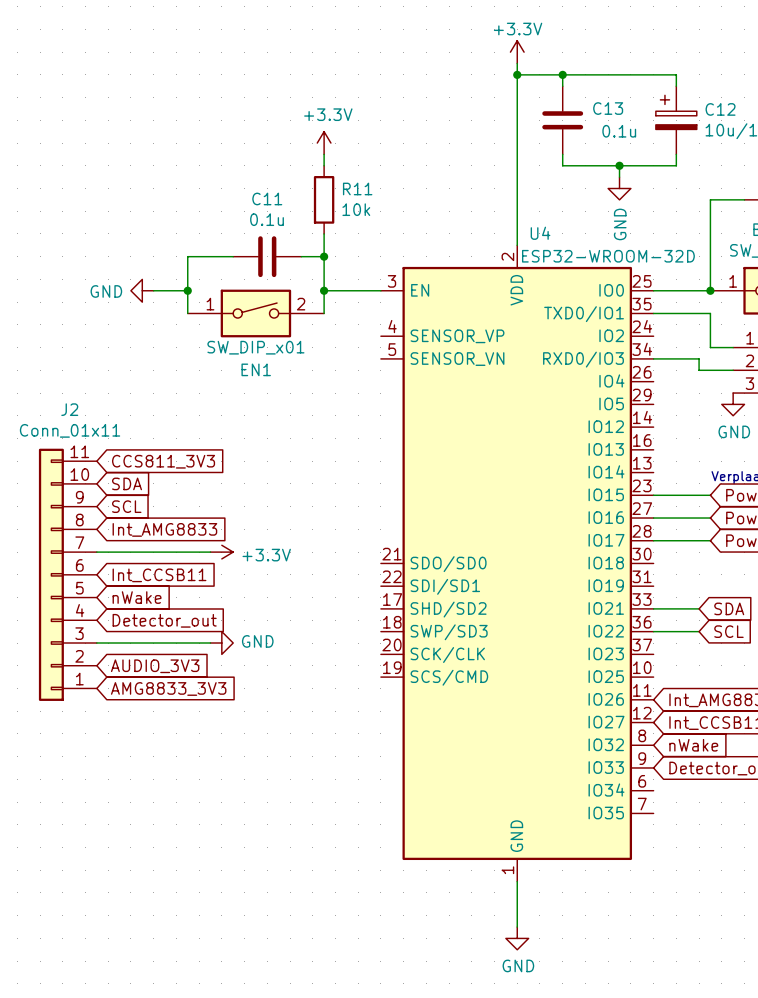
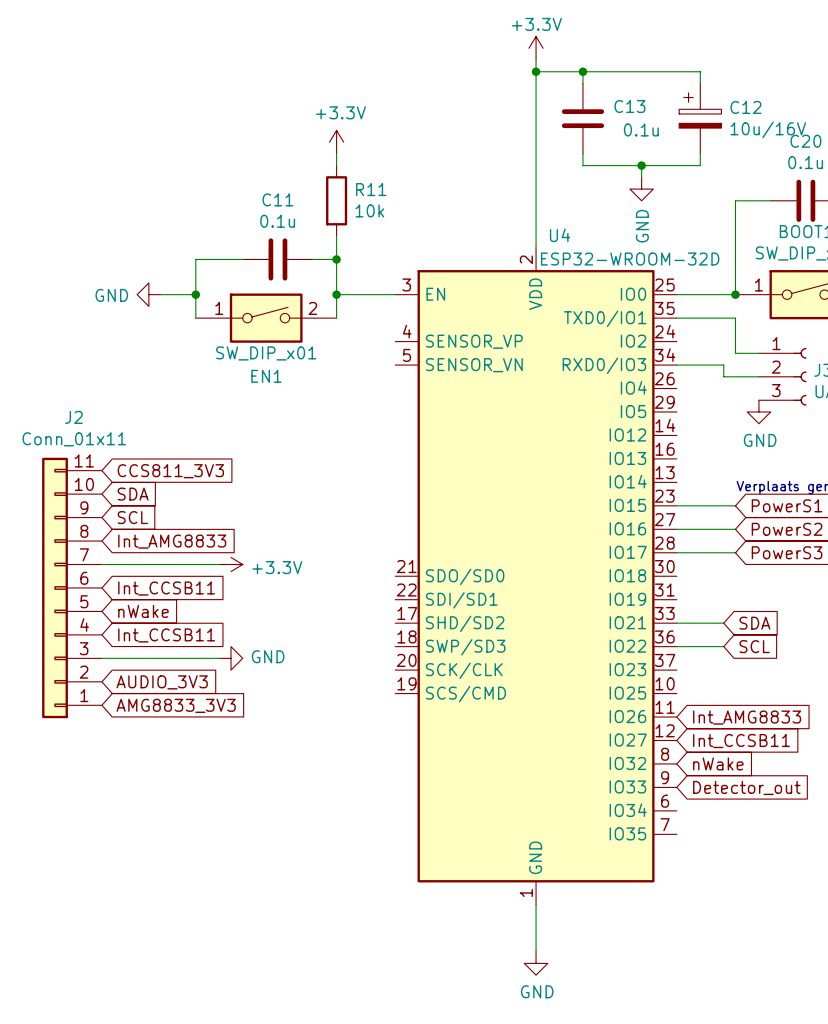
global label: Detector_out (164, 620) -> Int_CCSB11 (166, 635)

